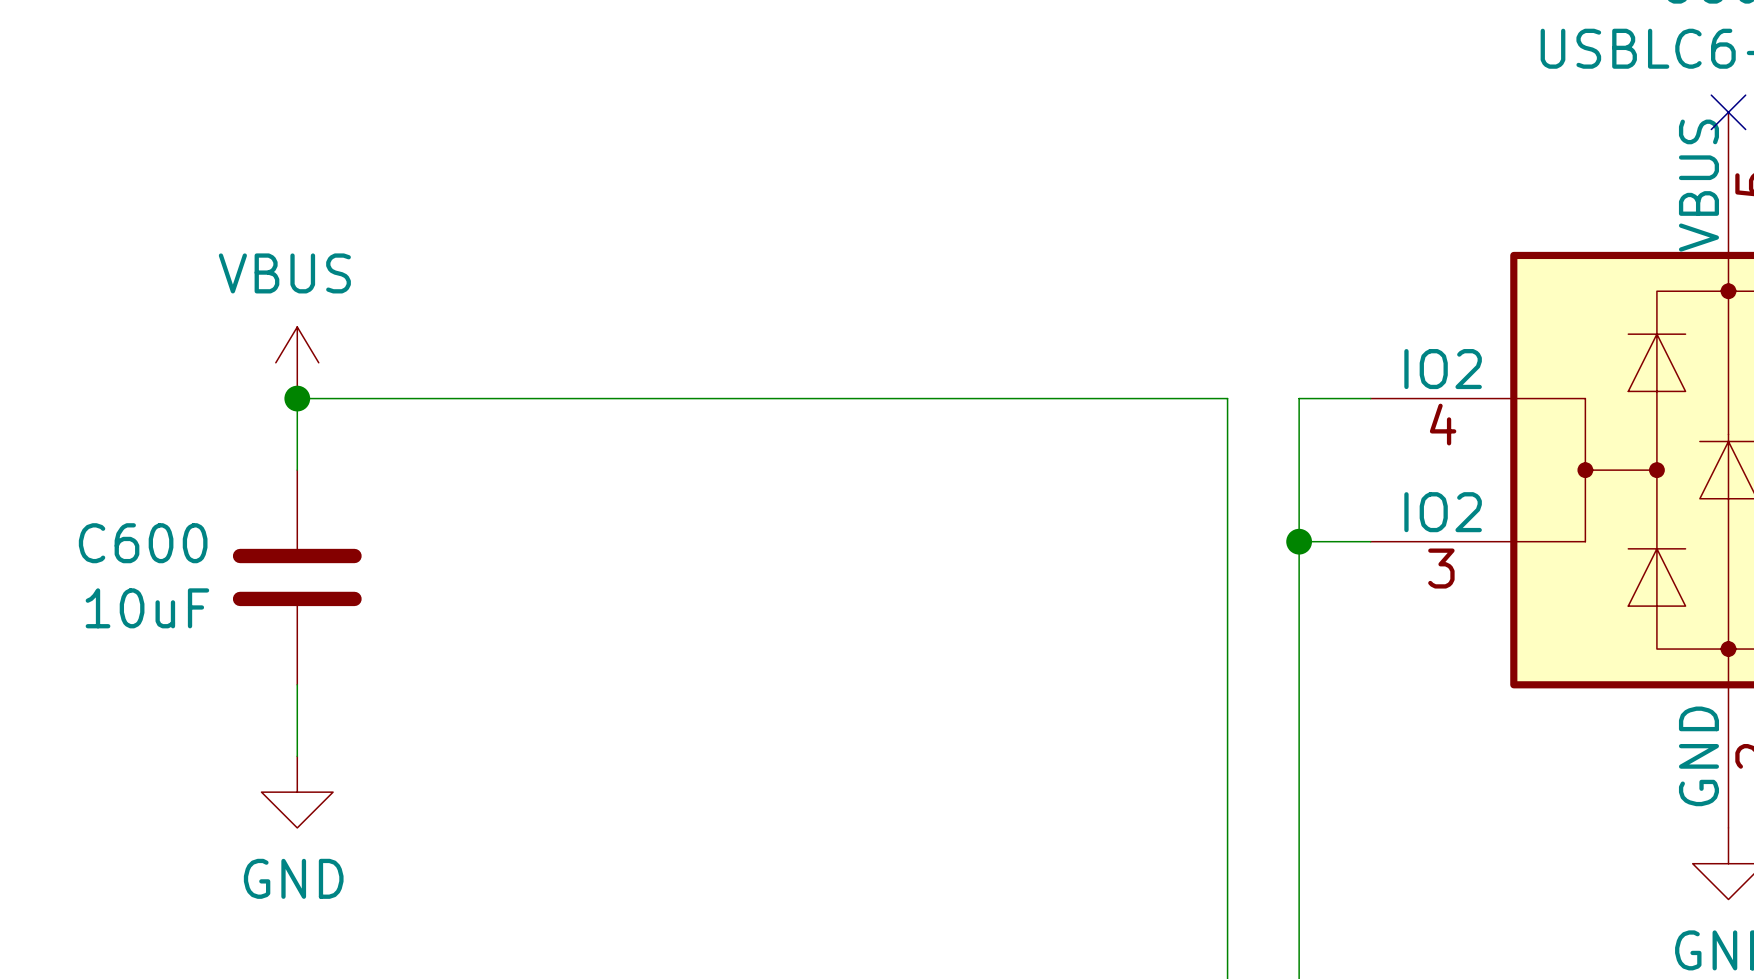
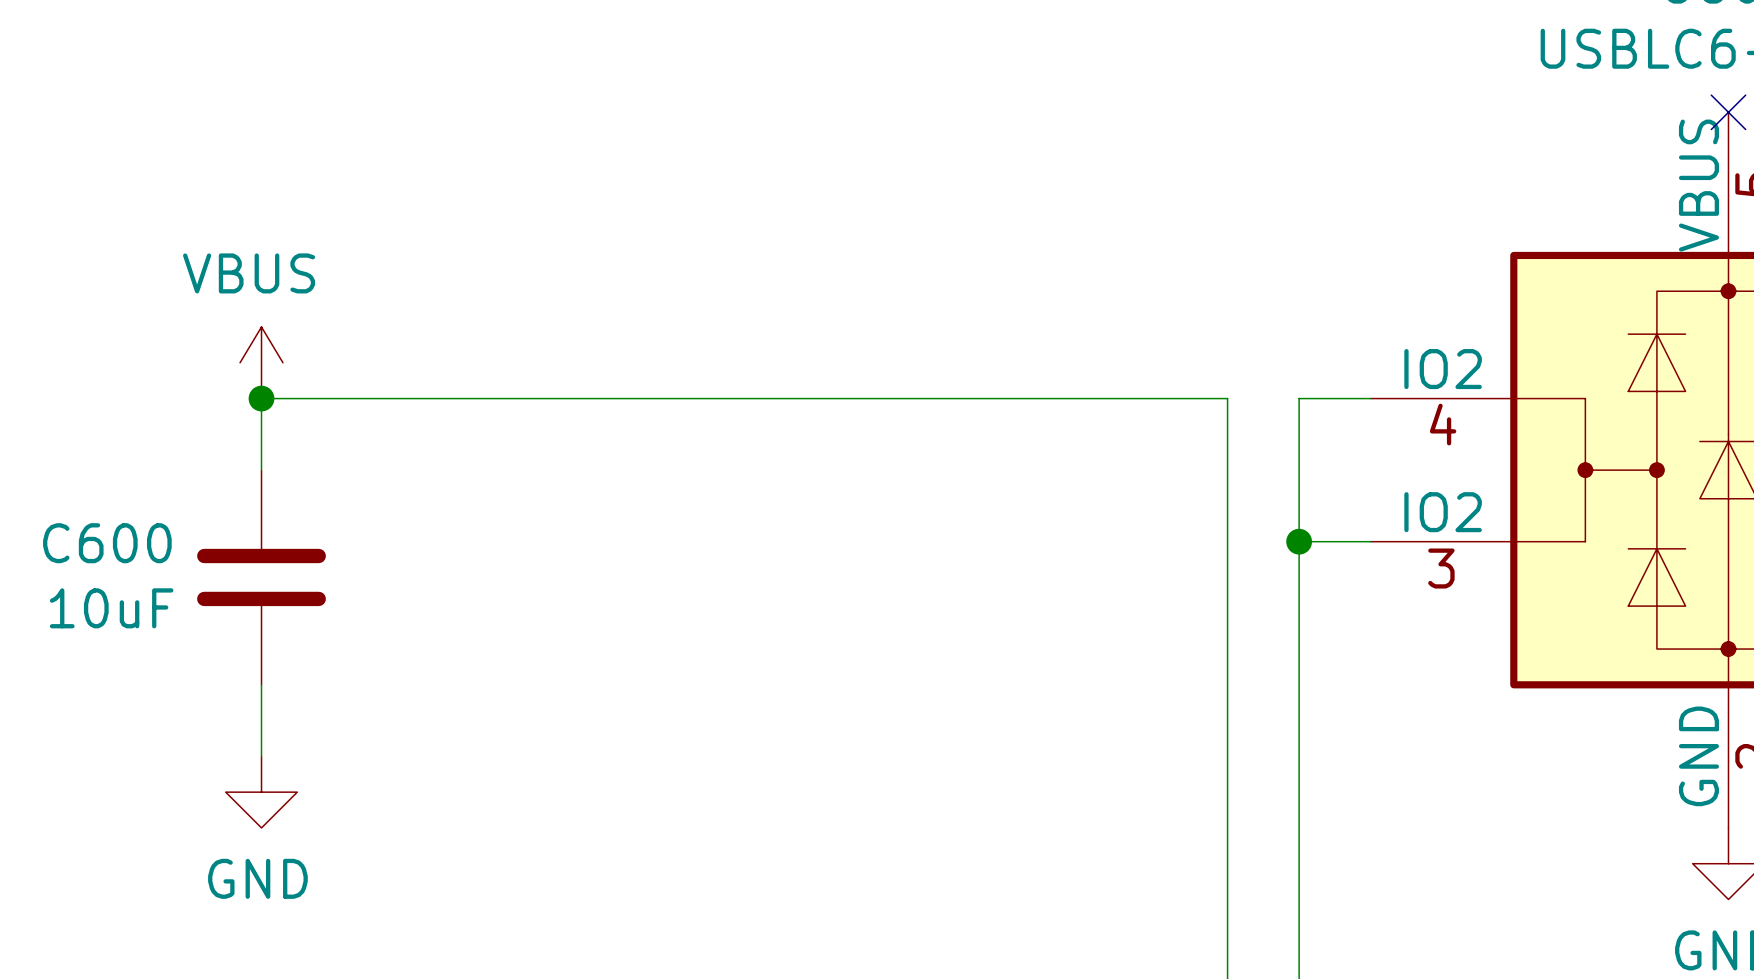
power symbol position: VBUS (297, 362) -> VBUS (261, 362)
wire: (297, 398) (297, 470) -> (297, 398) (261, 398) (261, 470)
junction position: (297, 398) -> (261, 398)
C600 position: (297, 577) -> (261, 577)
wire: (297, 684) (297, 756) -> (261, 684) (261, 756)
power symbol position: GND (297, 792) -> GND (261, 792)

